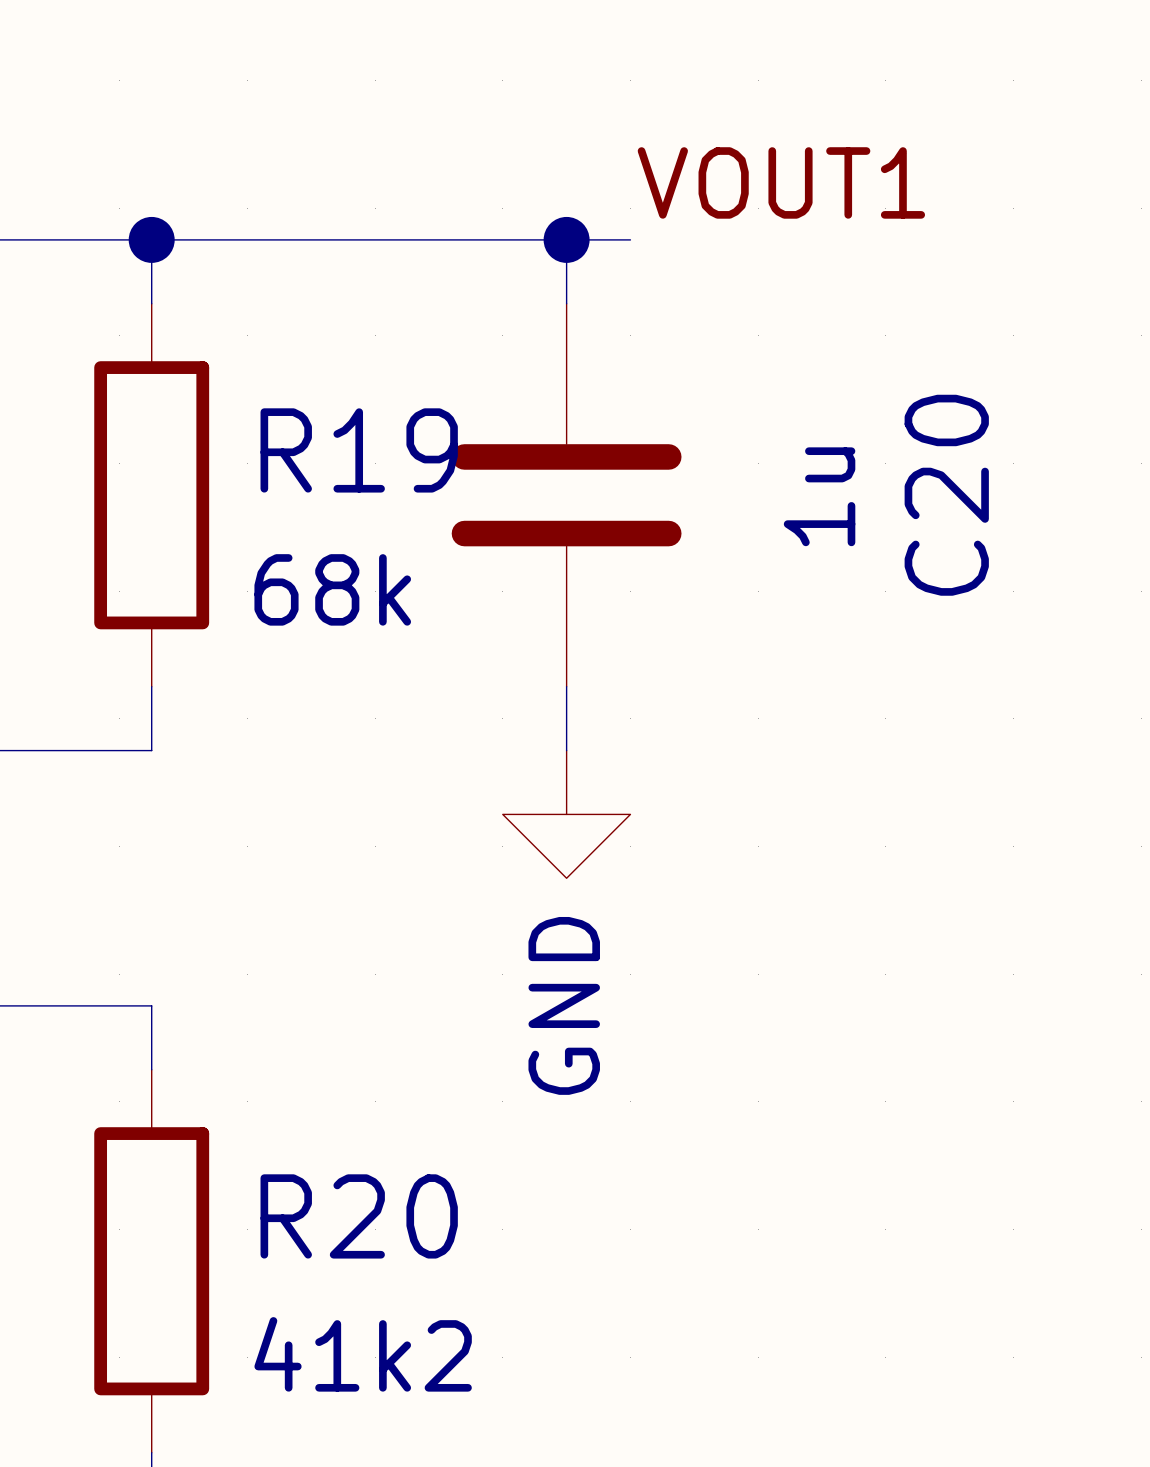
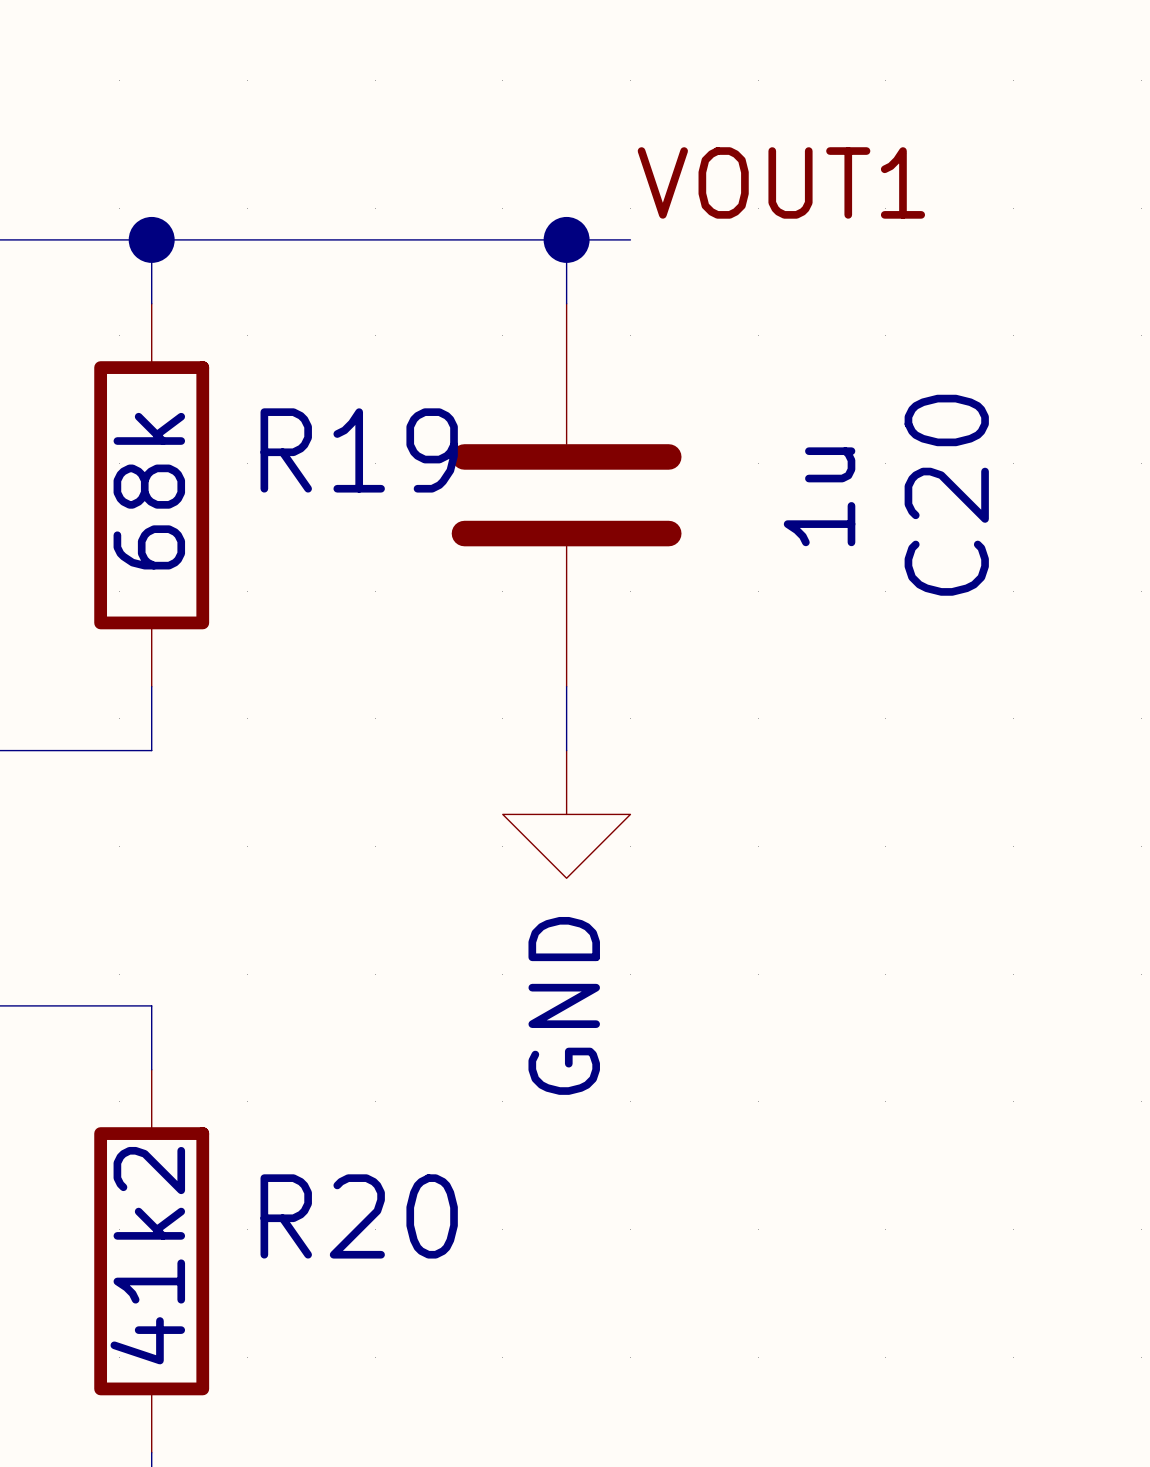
R19 text rotation: 0° (332, 589) -> 90° counterclockwise (149, 491)
R19 text position: 68k (332, 589) -> 68k (149, 491)
R20 text rotation: 0° (363, 1354) -> 90° counterclockwise (147, 1255)

